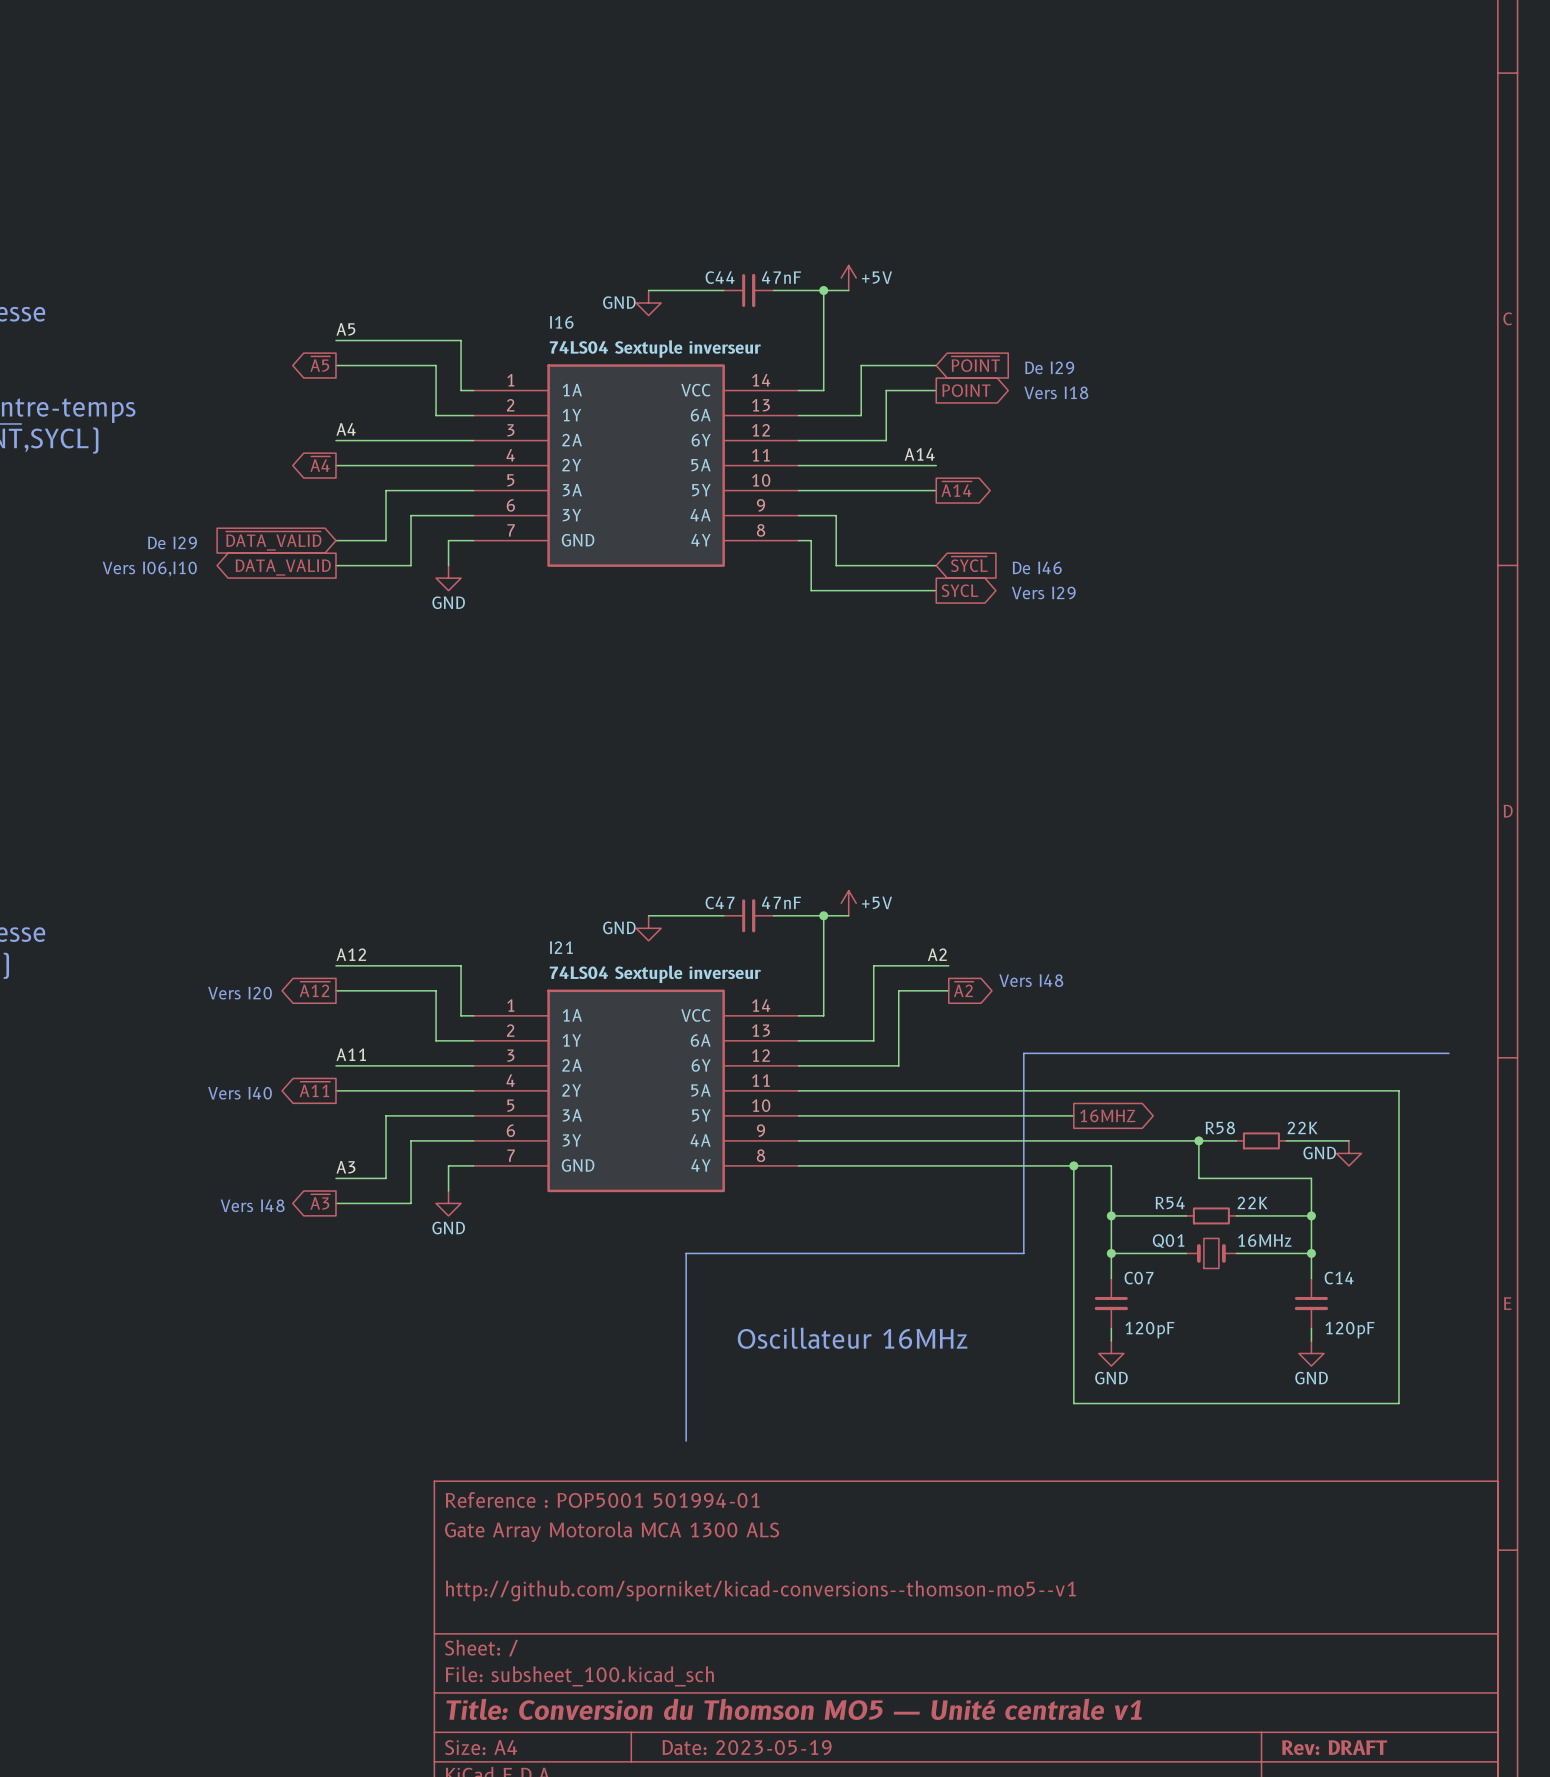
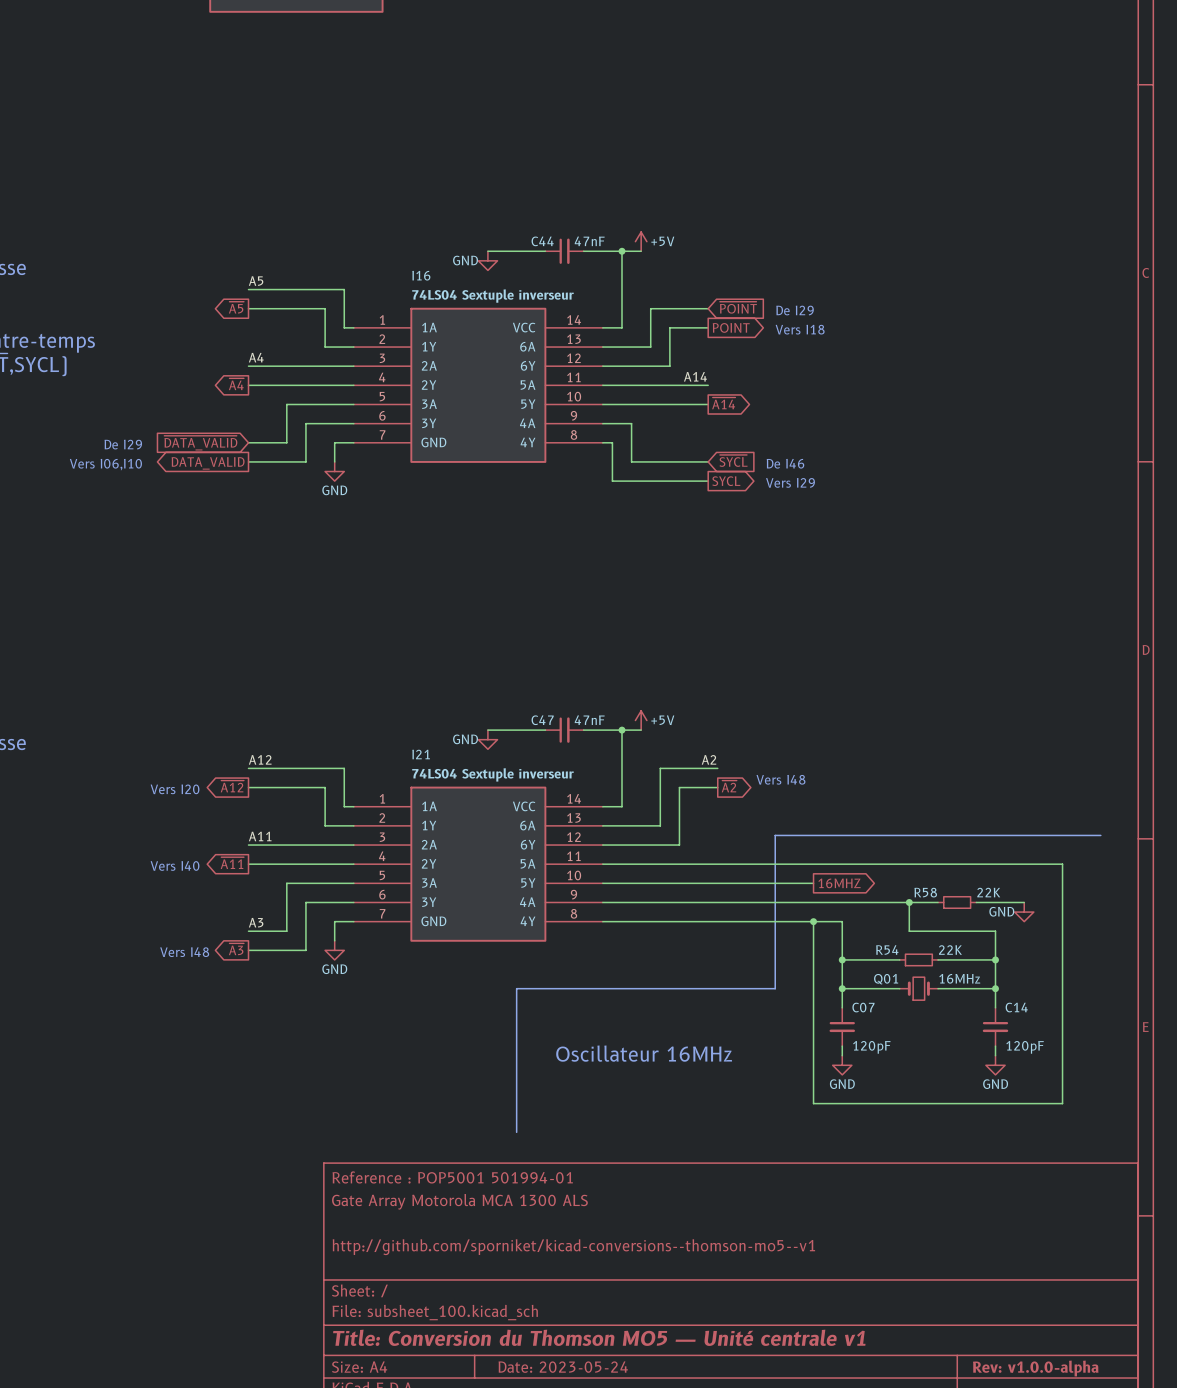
title block: Date: 2023-05-19 (747, 1747) -> Date: 2023-05-24 (563, 1367)
title block: Rev: DRAFT (1334, 1747) -> Rev: v1.0.0-alpha (1035, 1368)

